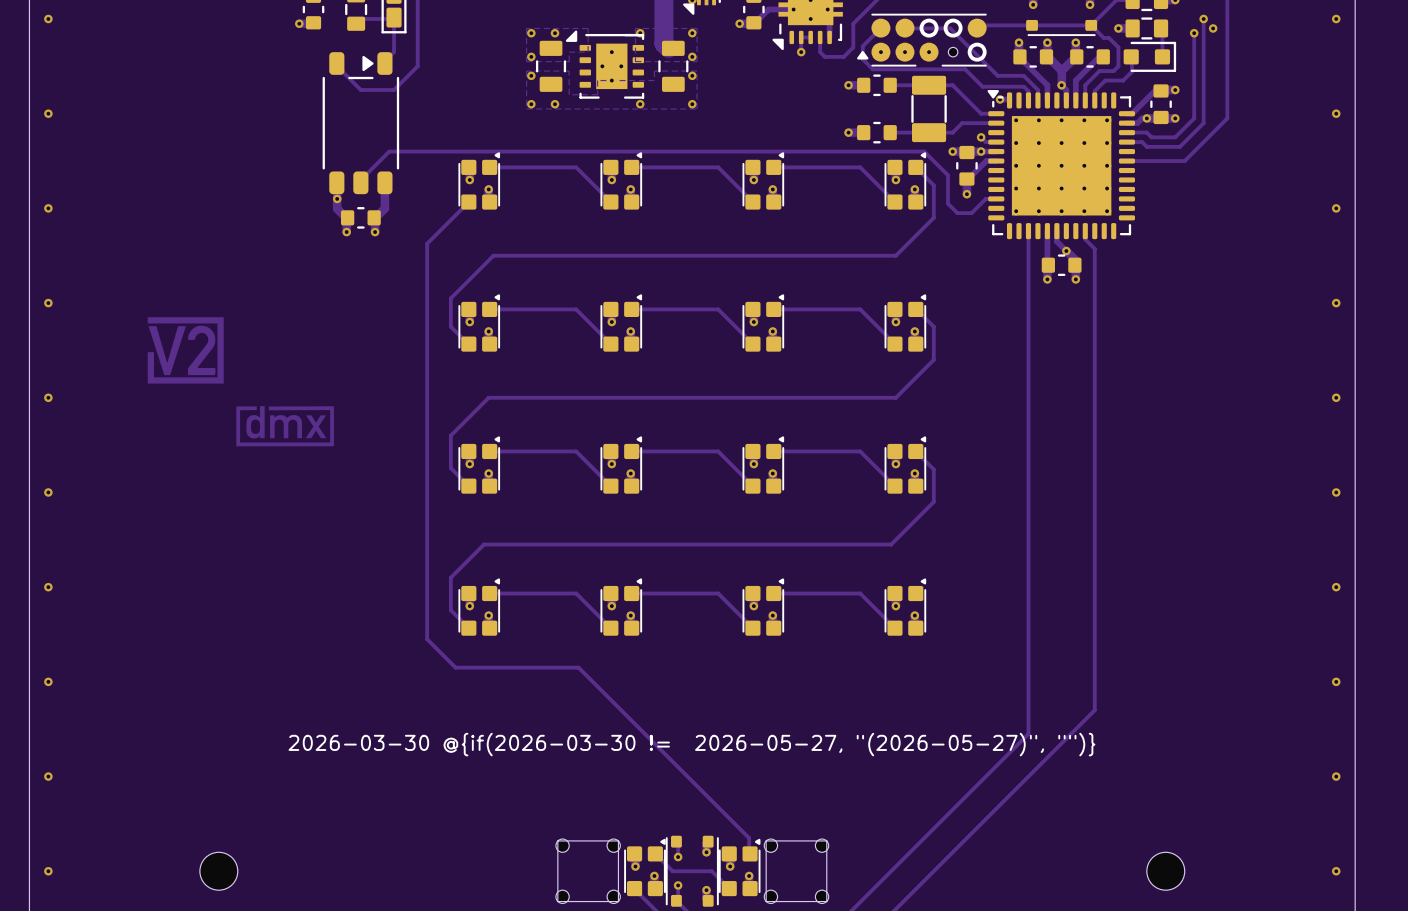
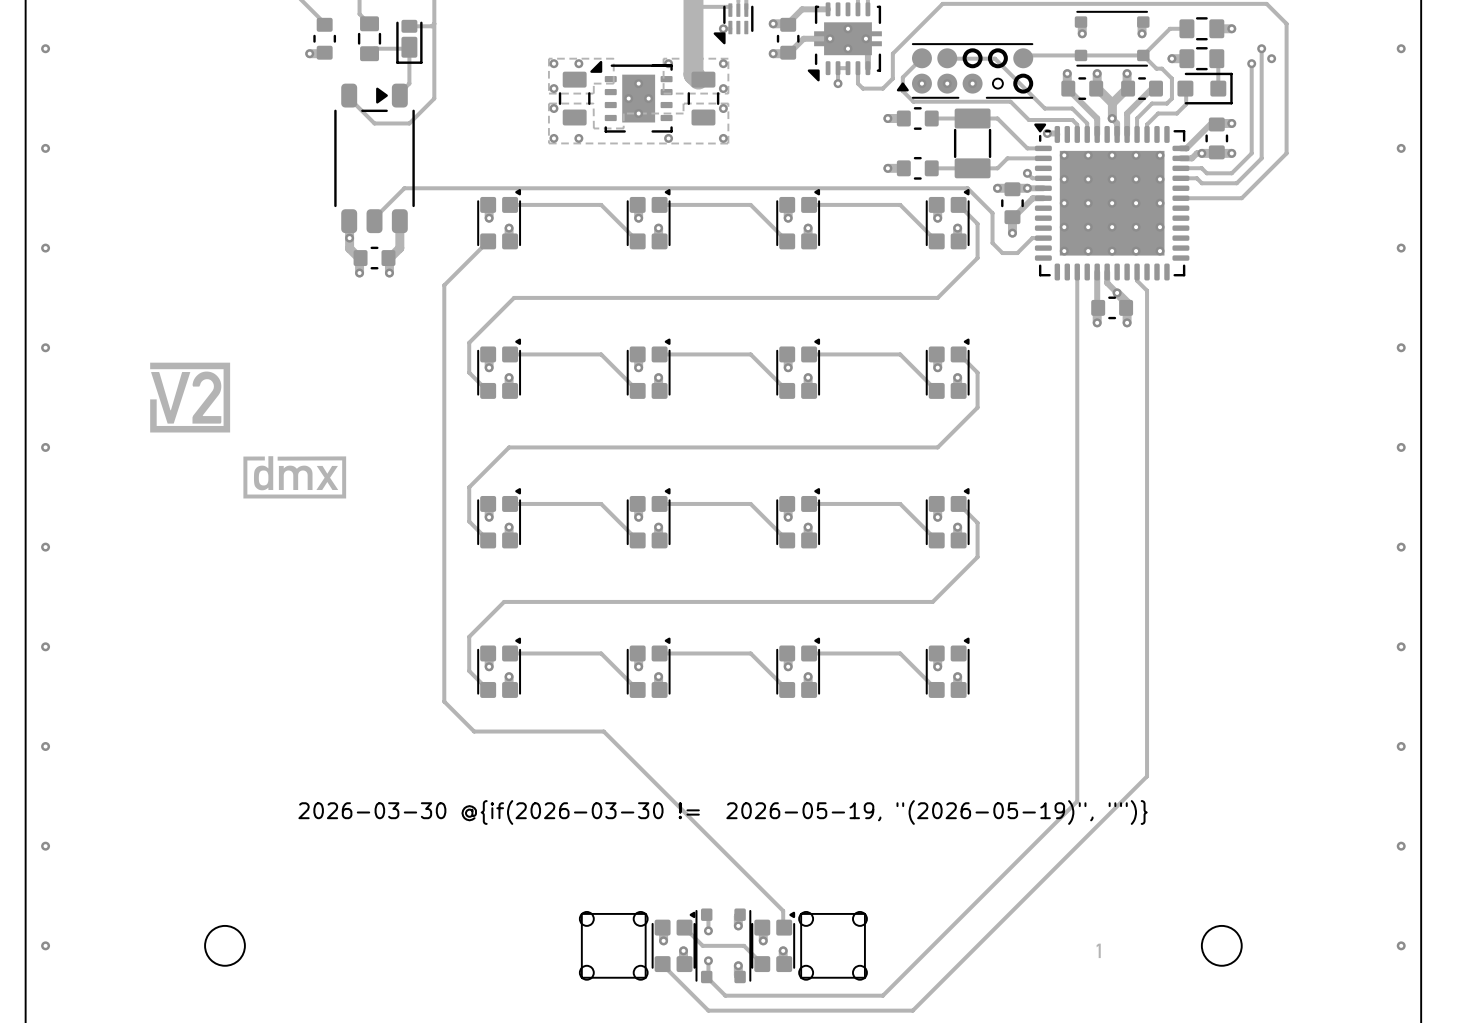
drawing shape: [288, 732, 1096, 757] -> [298, 800, 1148, 825]
drawing: none -> [1096, 943, 1101, 959]

